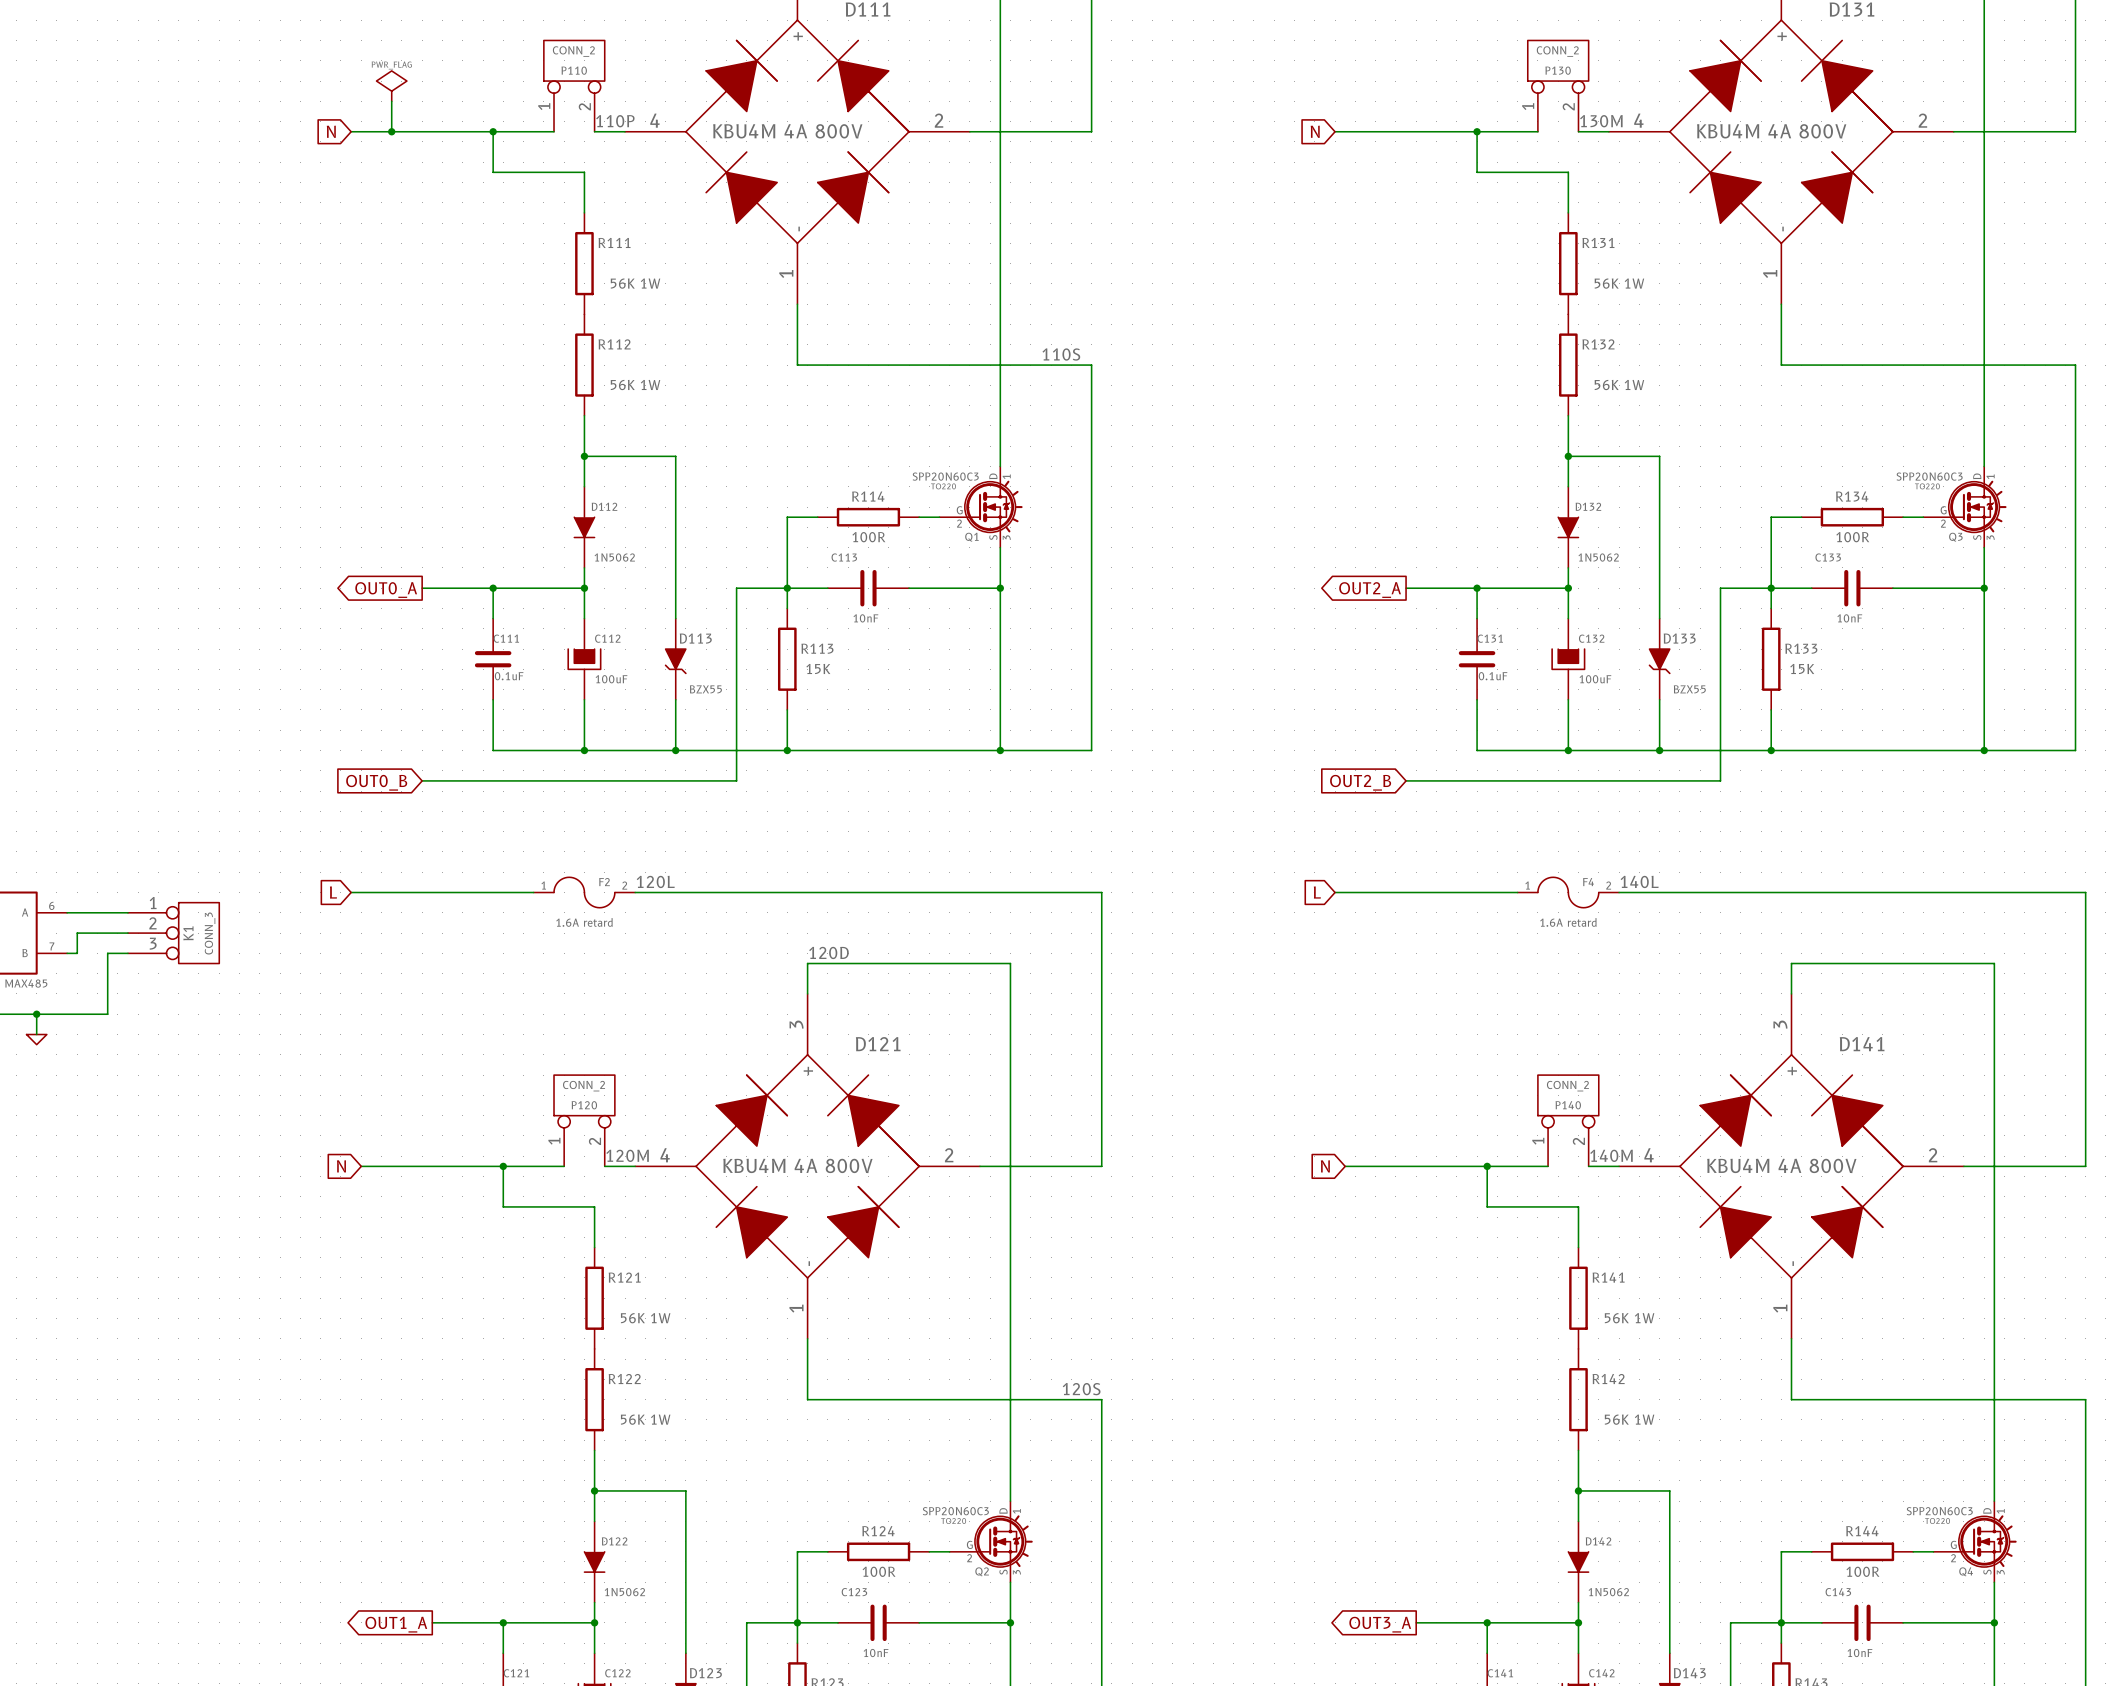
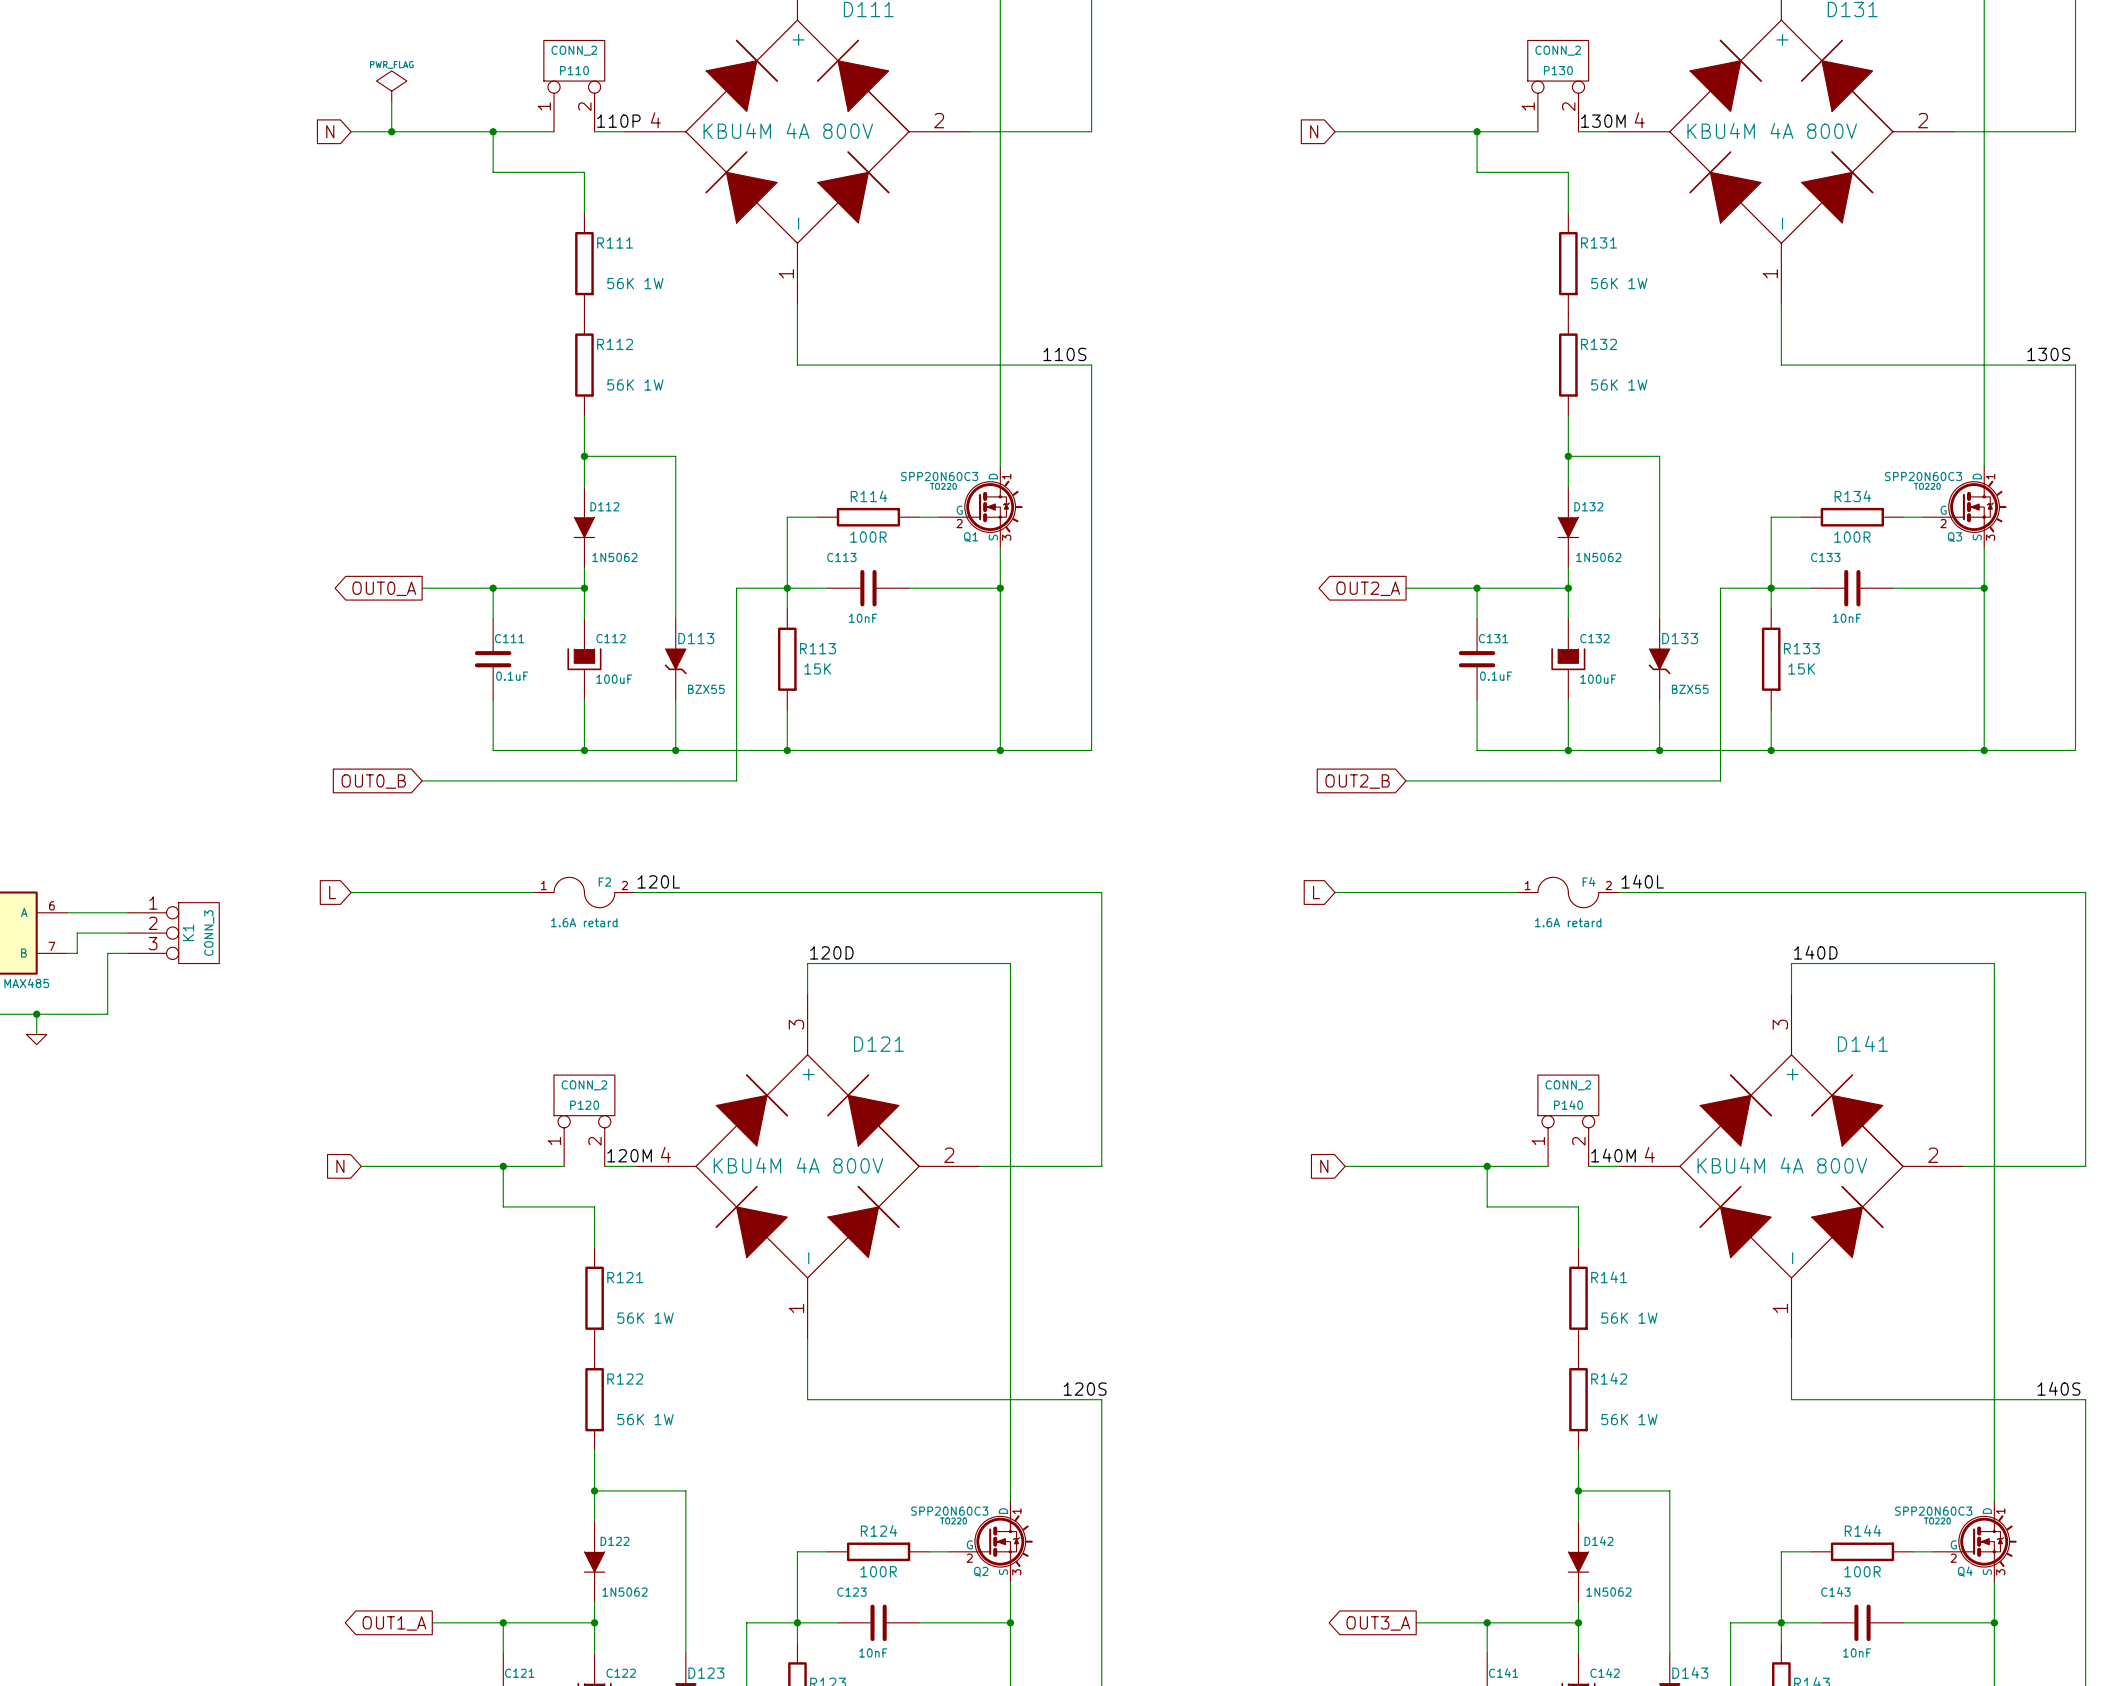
label: none -> 130S (2048, 354)
label: none -> 140D (1815, 952)
label: none -> 140S (2058, 1388)

